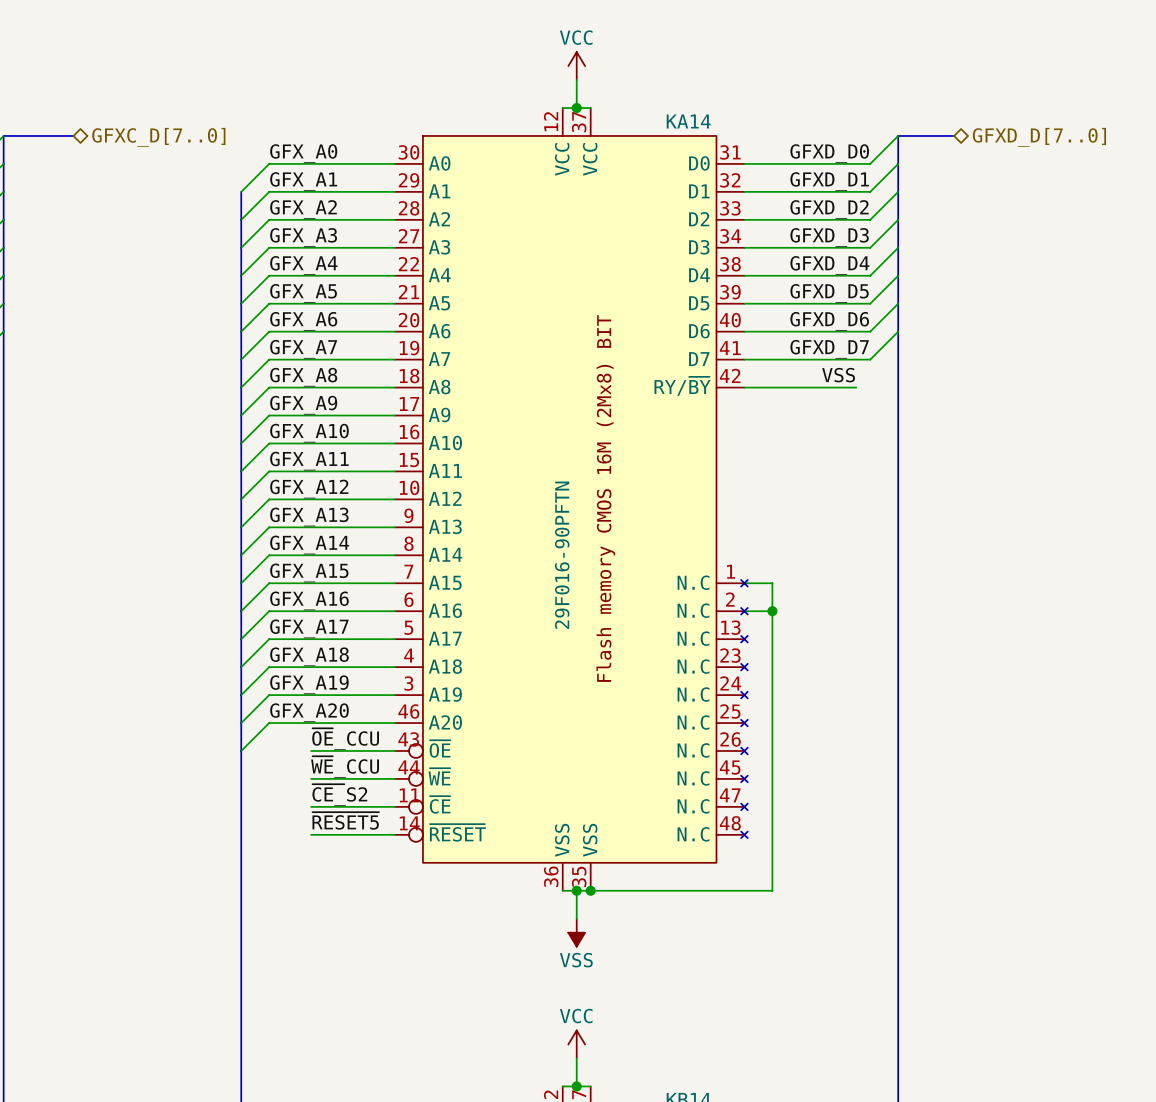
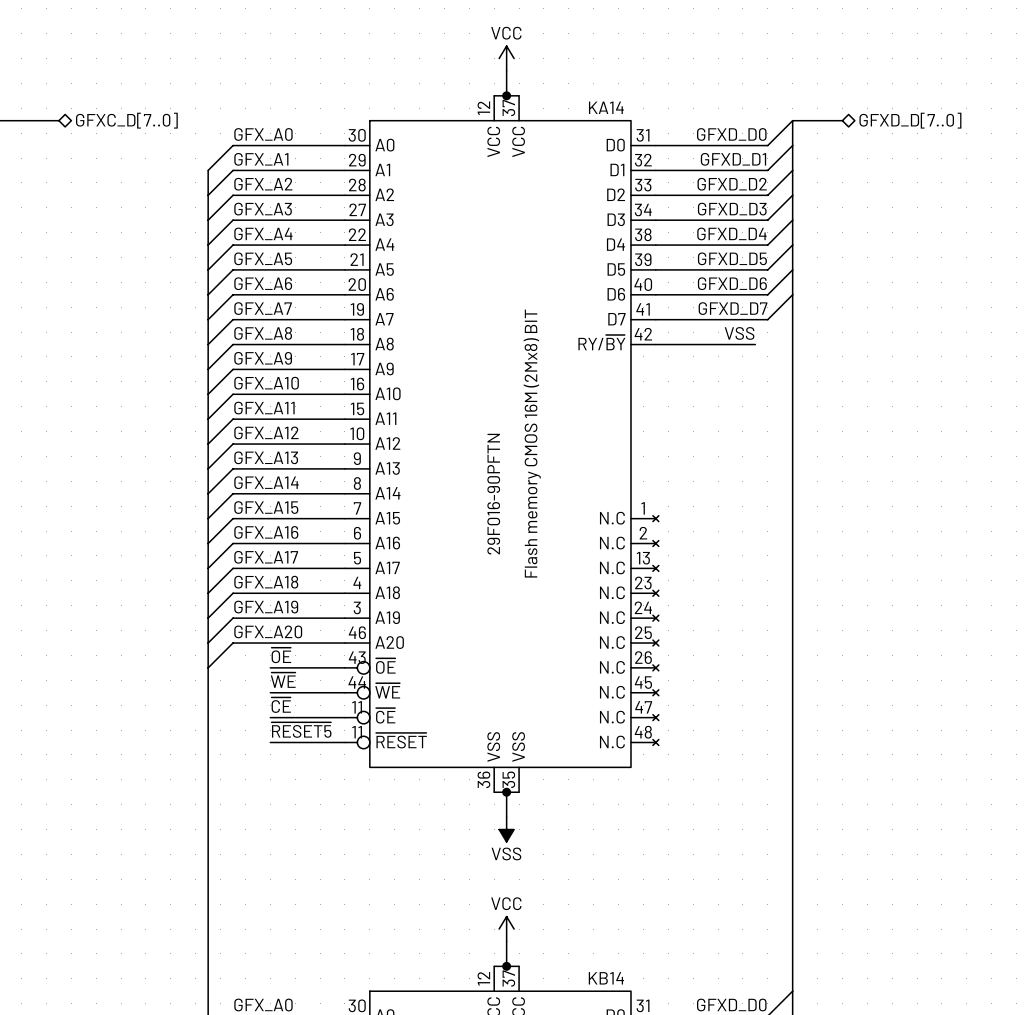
wire: (744, 583) (772, 583) (772, 890) (590, 890) -> none
wire: (744, 611) (772, 611) -> none
junction: (772, 611) -> none
label: ~{OE}_CCU (345, 739) -> ~{OE} (281, 655)
label: ~{WE}_CCU (345, 767) -> ~{WE} (283, 680)
label: ~{CE_}S2 (339, 795) -> ~{CE} (281, 705)
KA14 pin number: 14 (409, 823) -> 11 (357, 732)
junction: (590, 890) -> none

